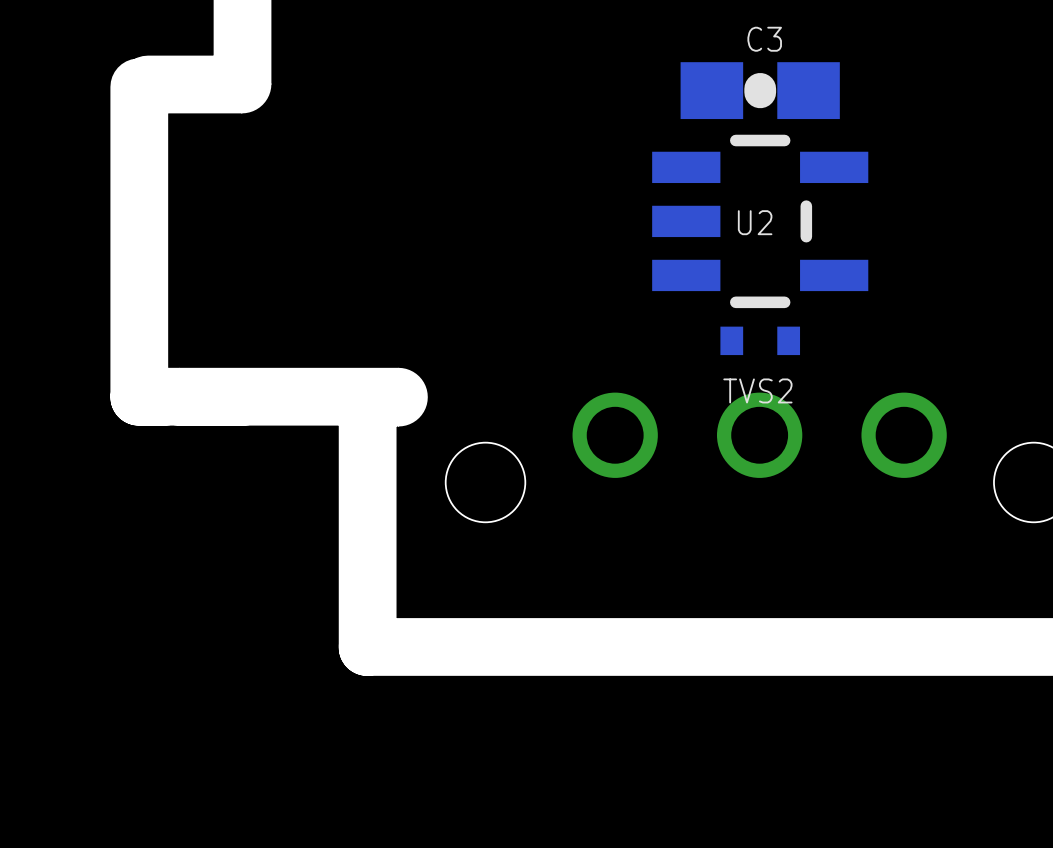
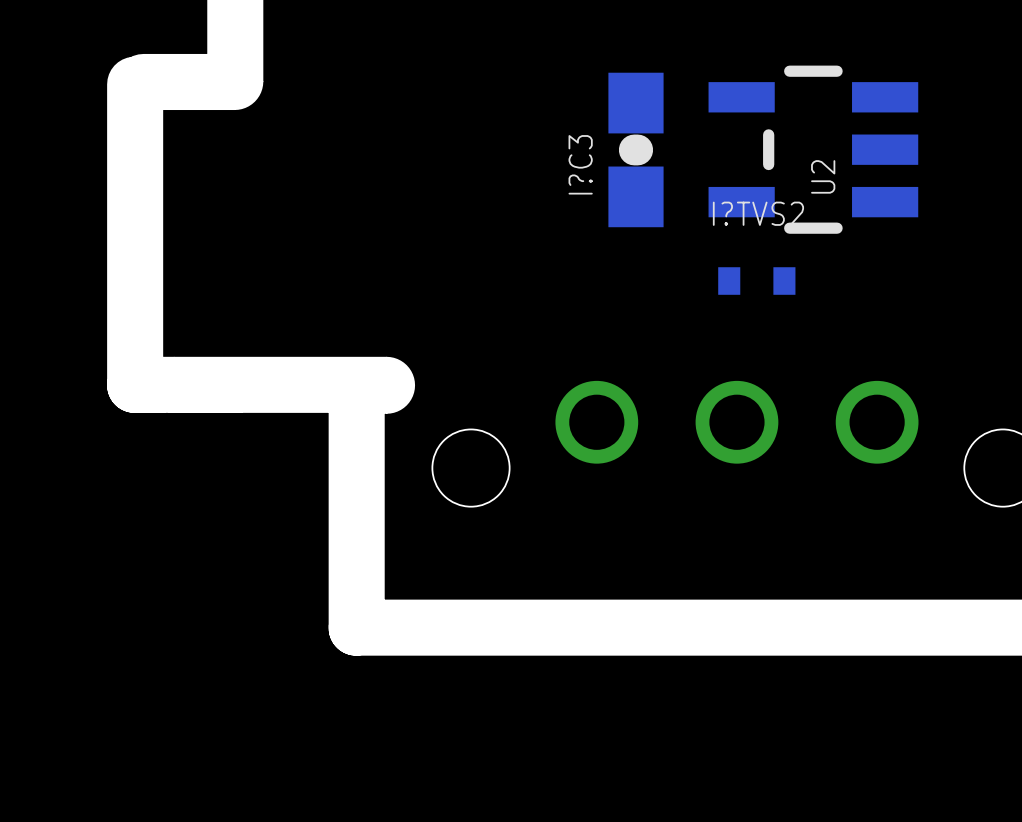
C3: (760, 90) -> none
I?C3: none -> (635, 149)
U2 rotation: 0° (760, 221) -> 180° (813, 149)
TVS2 position: (760, 340) -> (756, 281)
TVS2 name: TVS2 (757, 390) -> I?TVS2 (758, 213)

